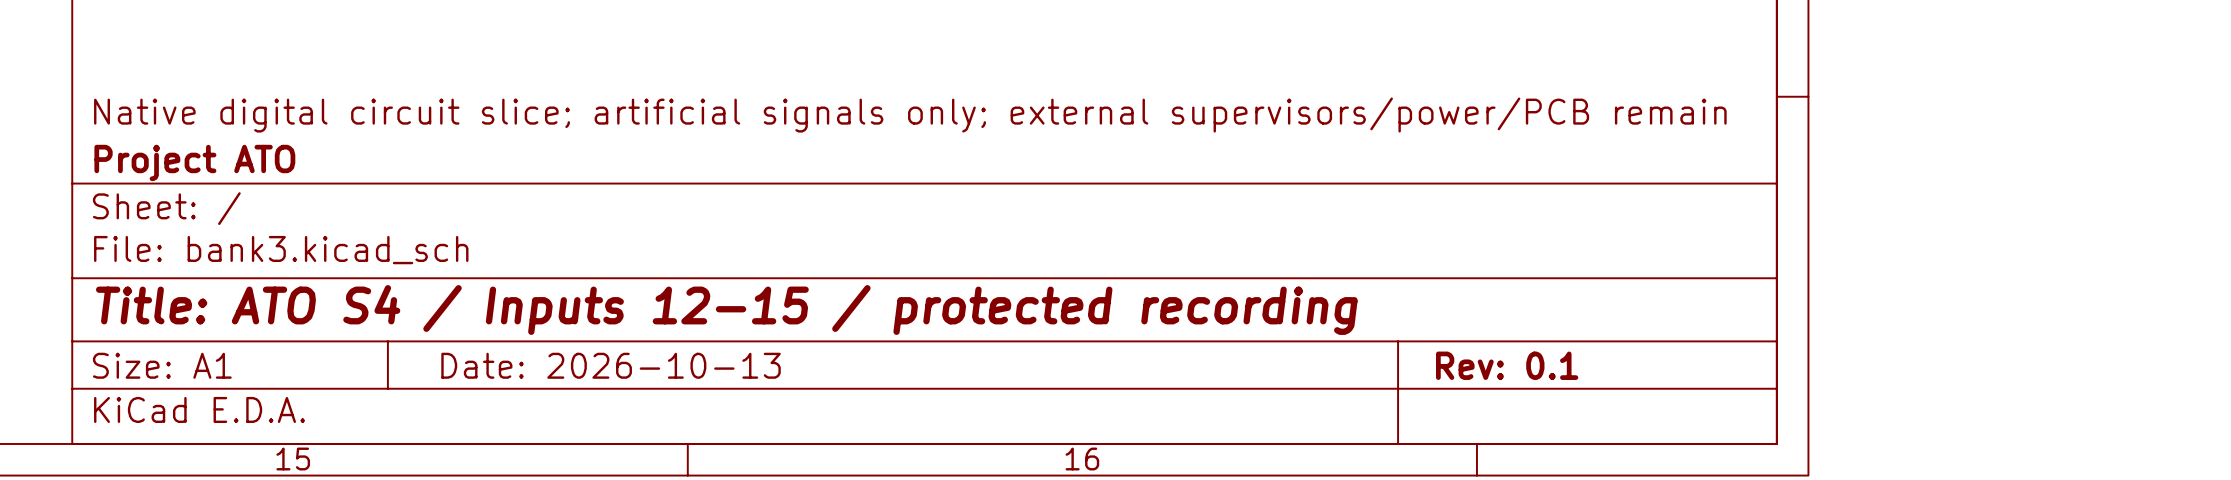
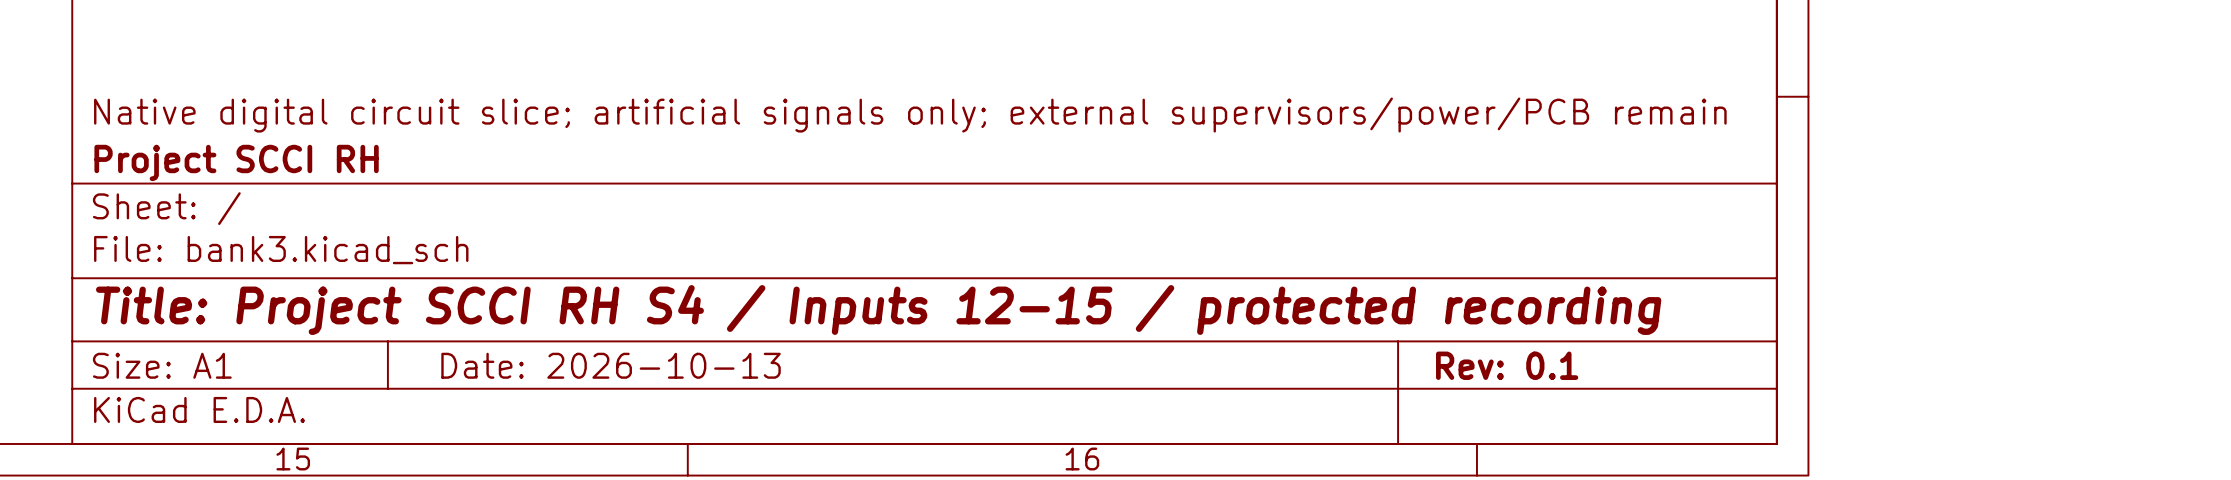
title block: Project ATO (194, 162) -> Project SCCI RH (236, 162)
title block: Title: ATO S4 / Inputs 12-15 / protected recording (726, 309) -> Title: Project SCCI RH S4 / Inputs 12-15 / protected recording (878, 309)

